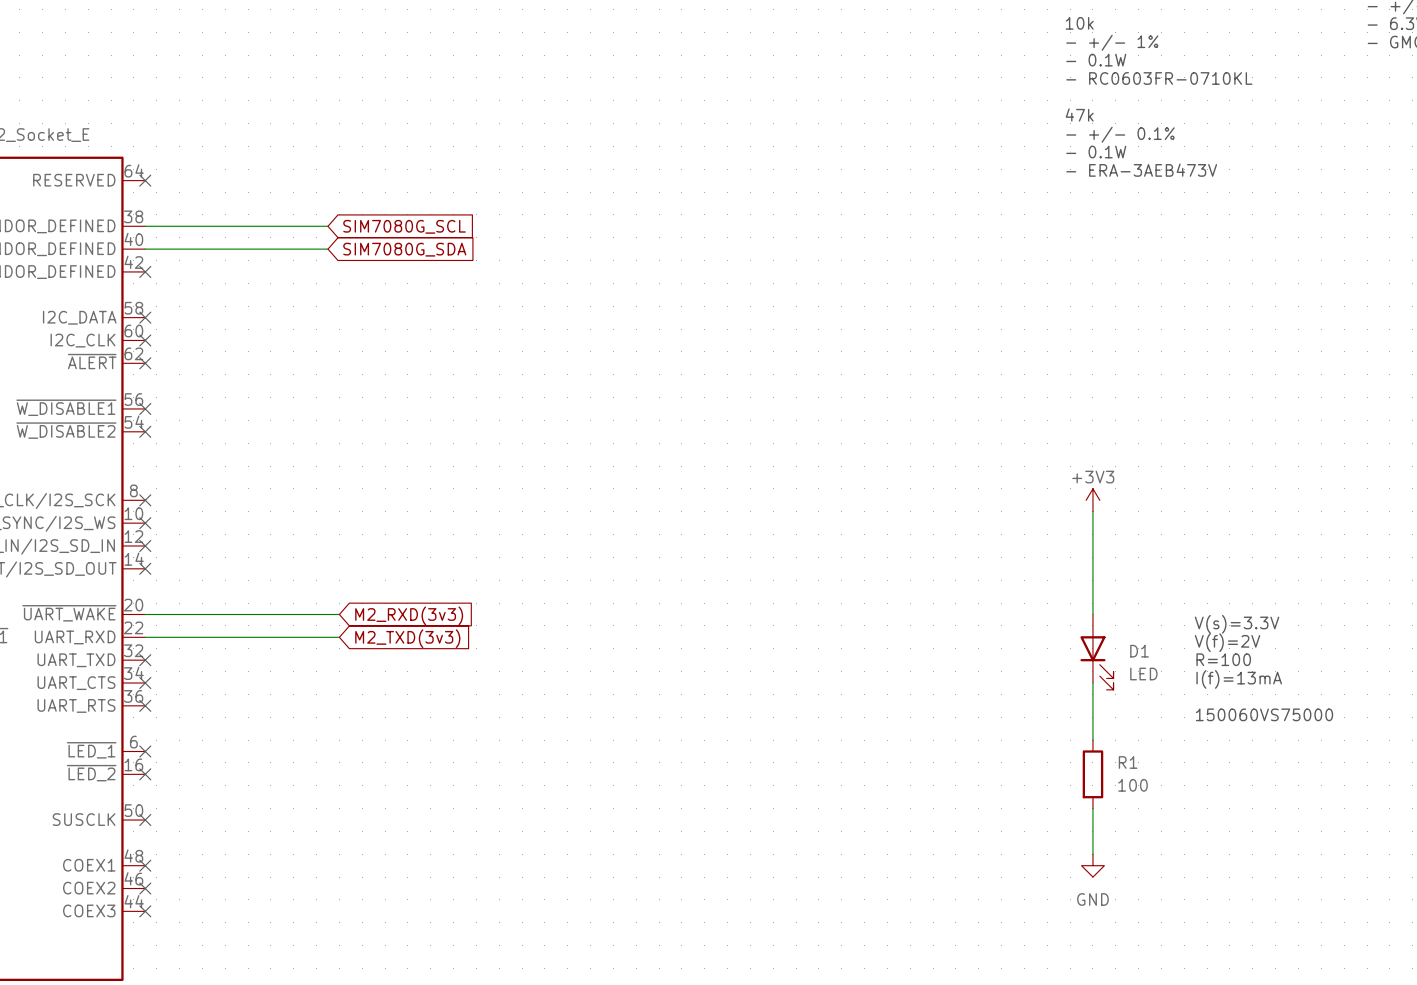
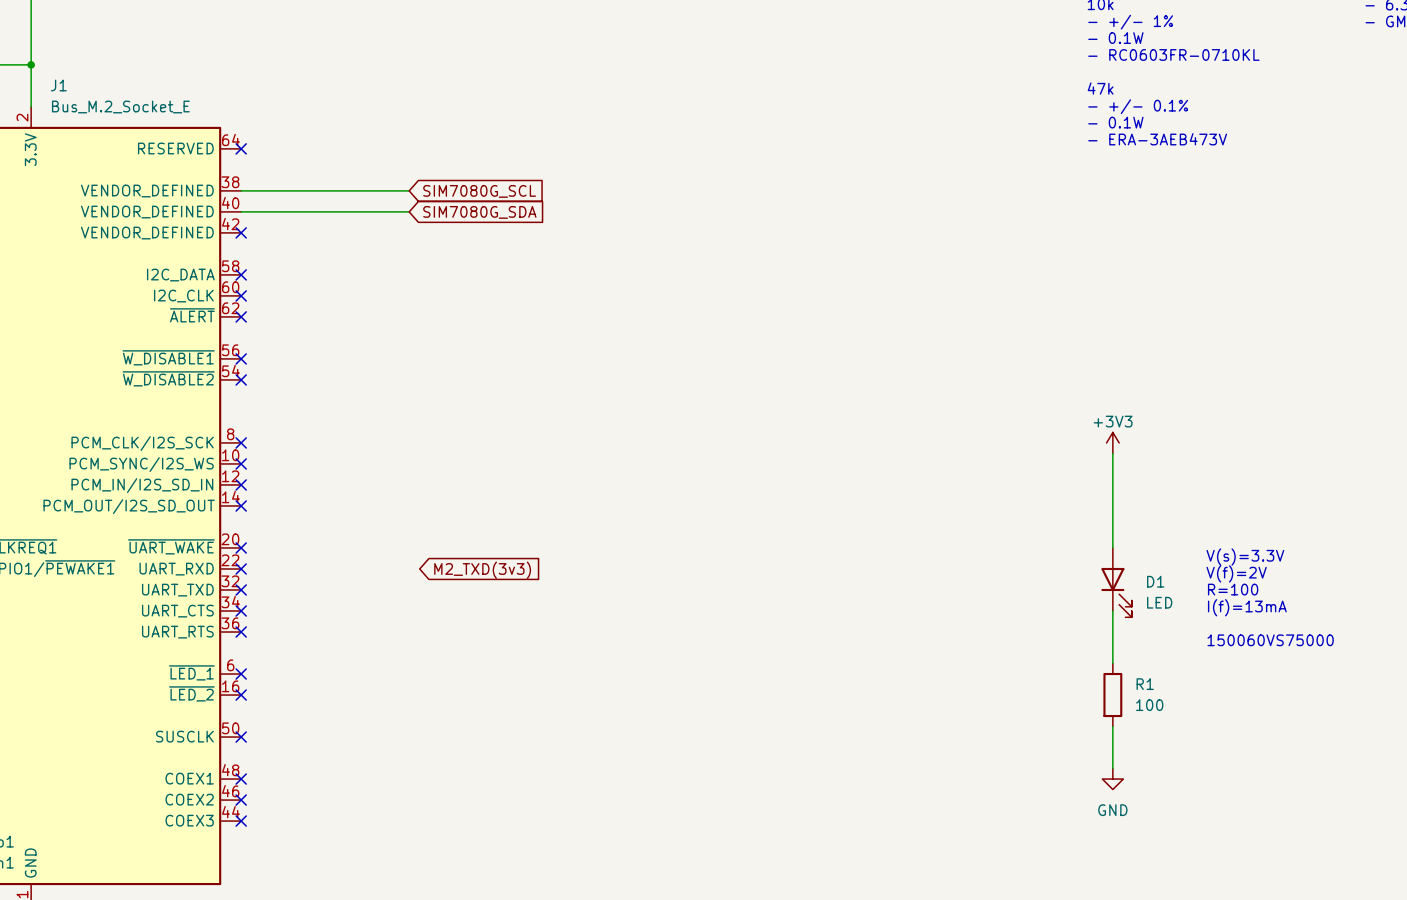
wire: (145, 614) (339, 614) -> none
no-connect mark: none -> (241, 547)
global label: M2_RXD(3v3) (409, 615) -> none
wire: (145, 637) (339, 637) -> none
no-connect mark: none -> (241, 568)

